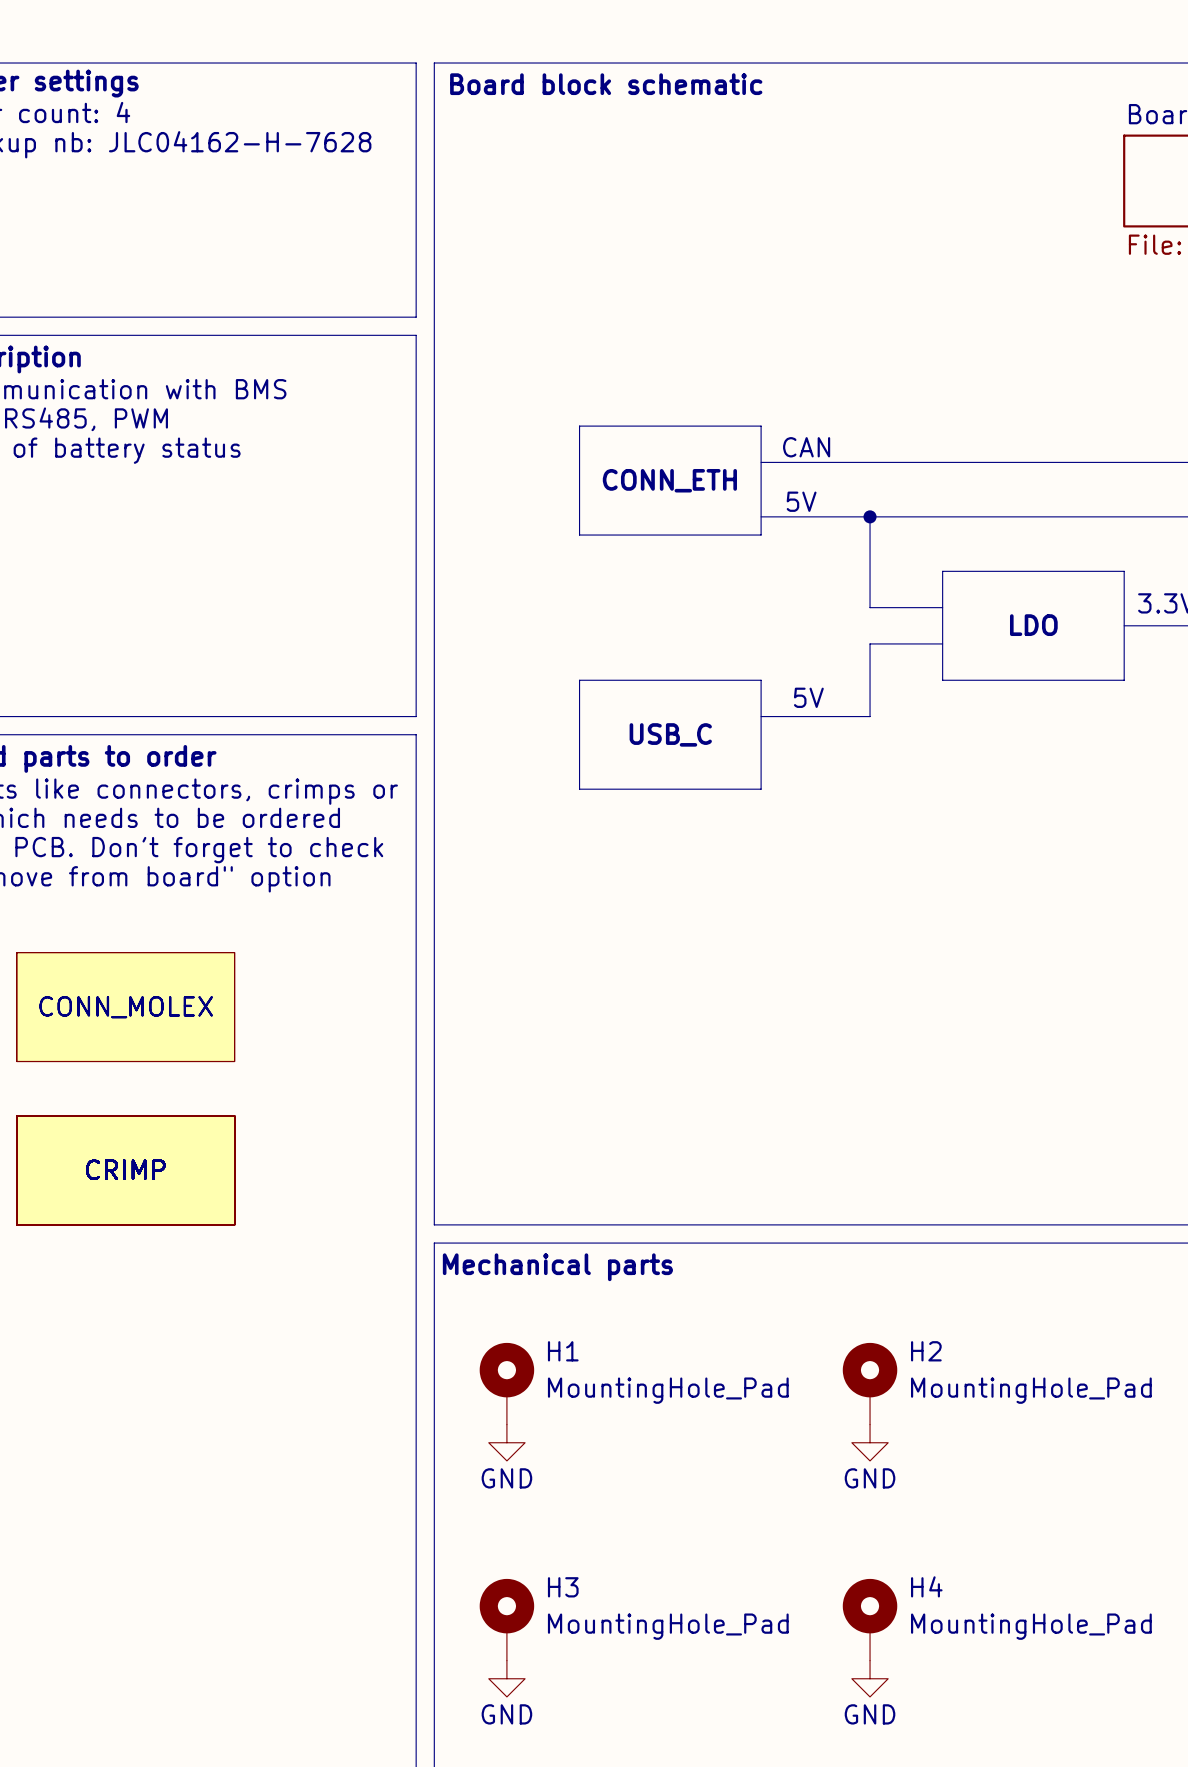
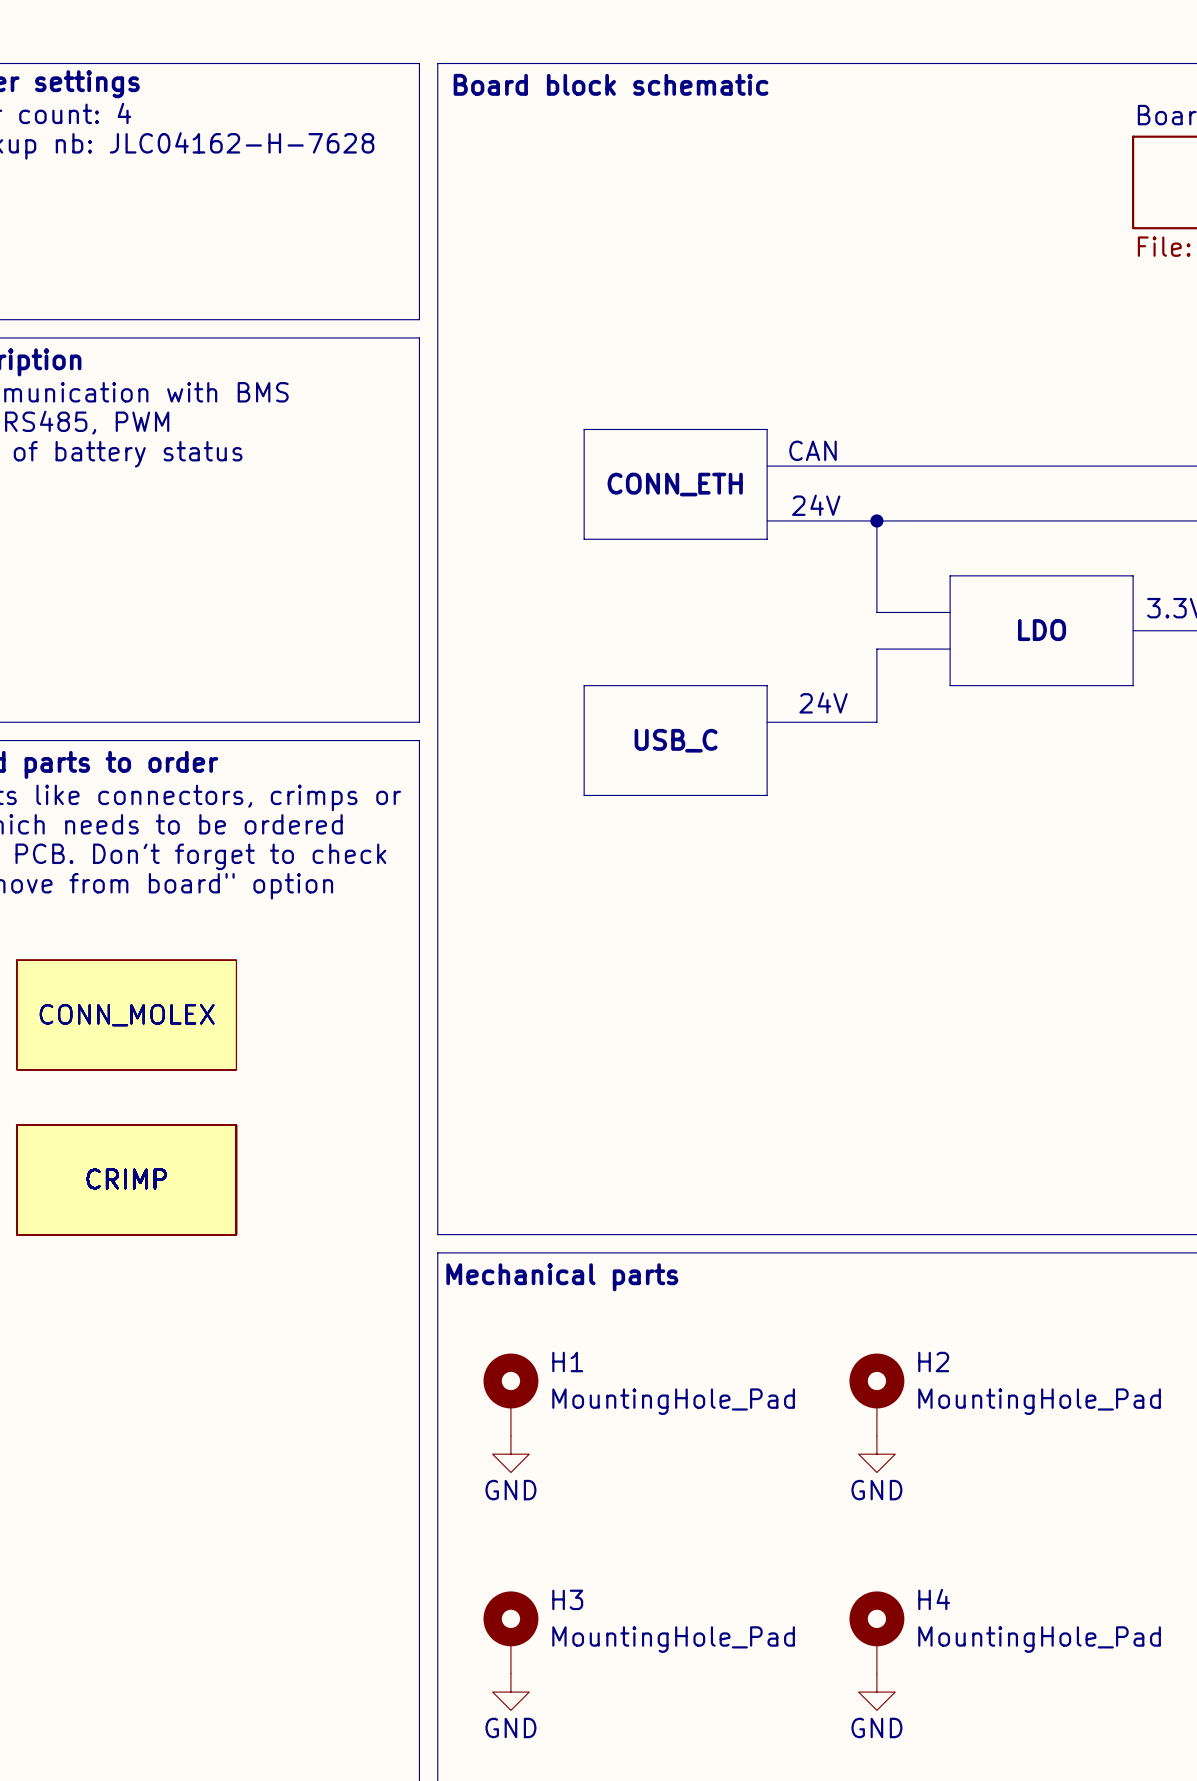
text: 5V (801, 501) -> 24V (816, 505)
text: 5V (808, 697) -> 24V (823, 702)

